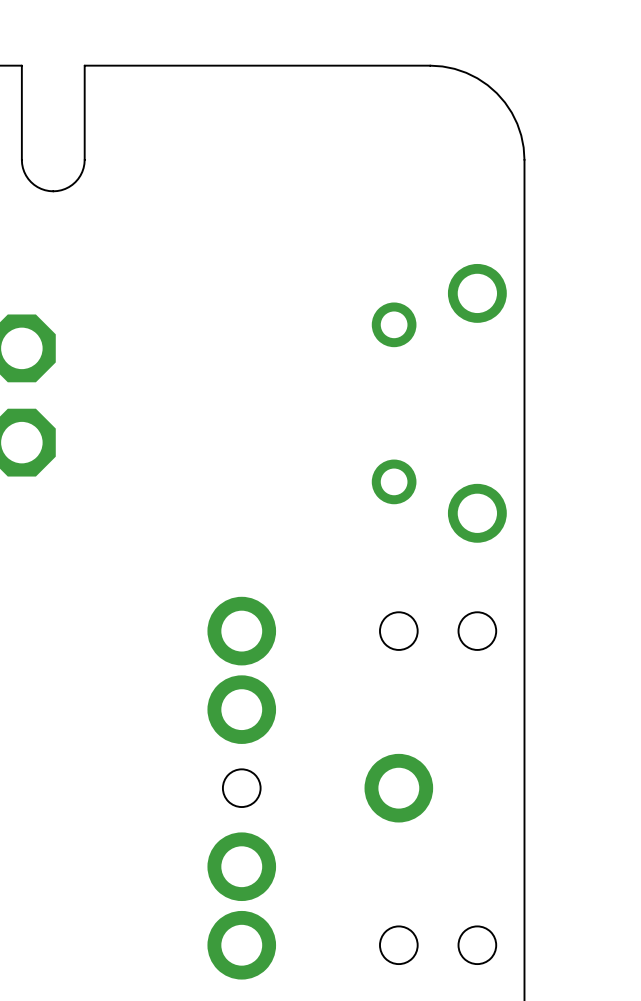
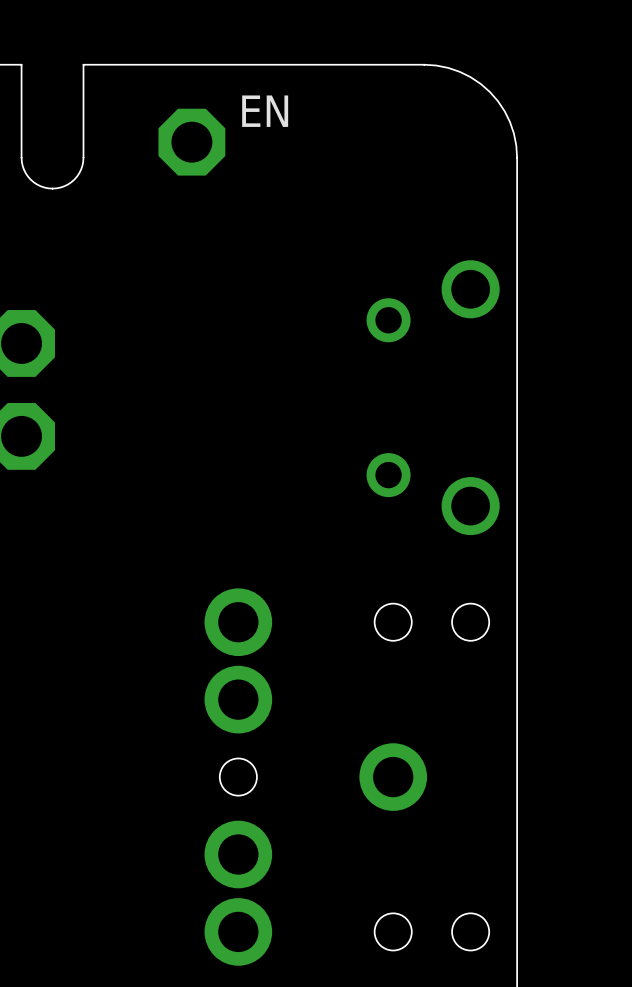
text: none -> EN (265, 111)
part: none -> (191, 142)

